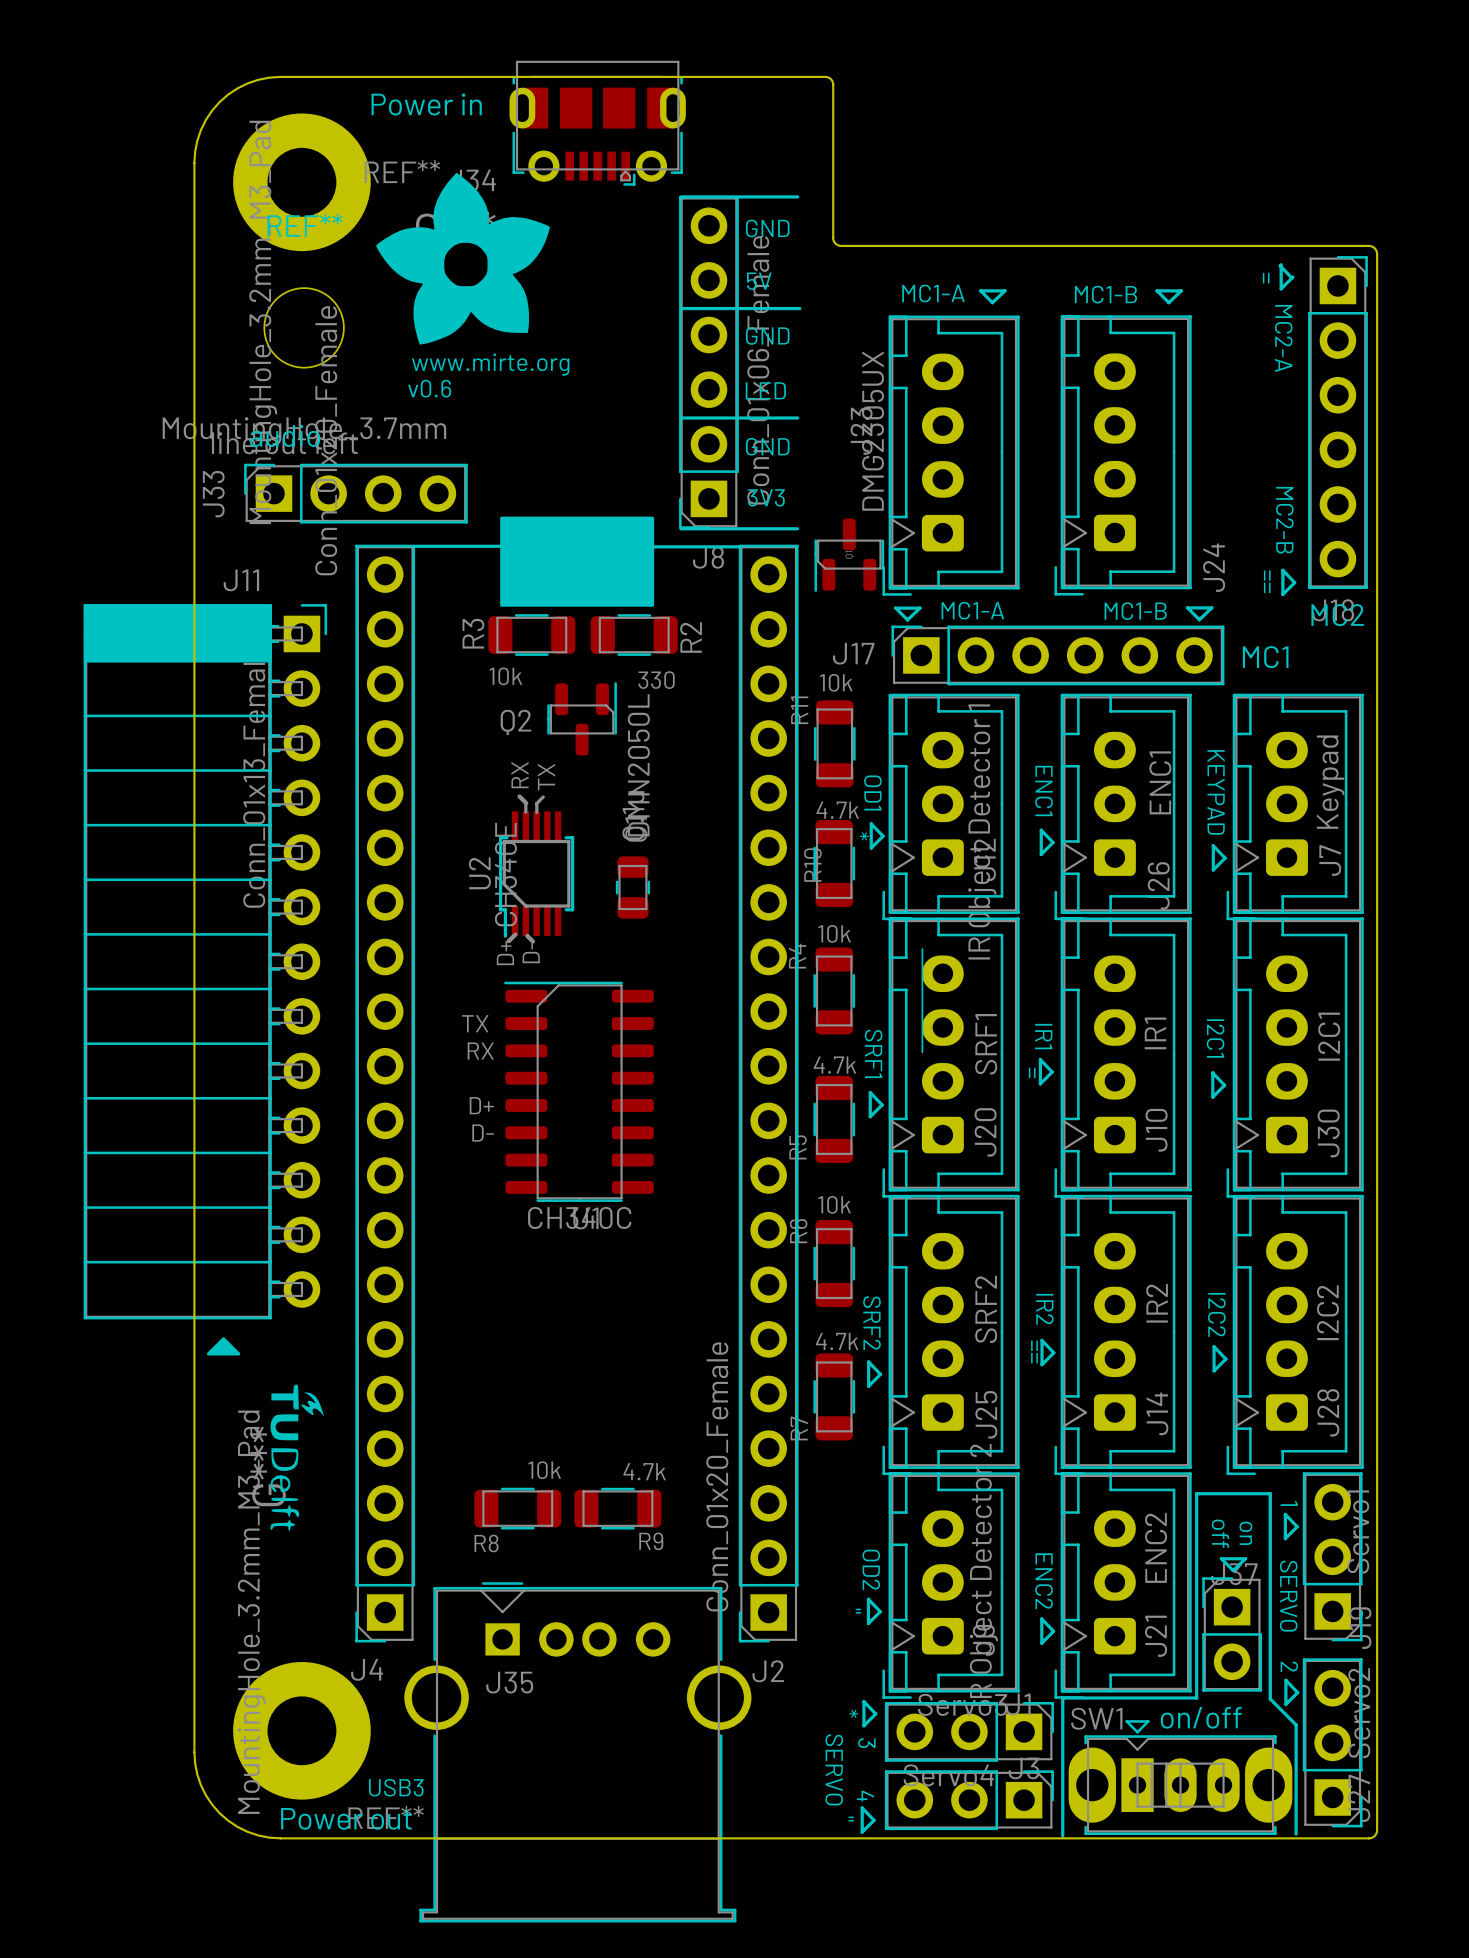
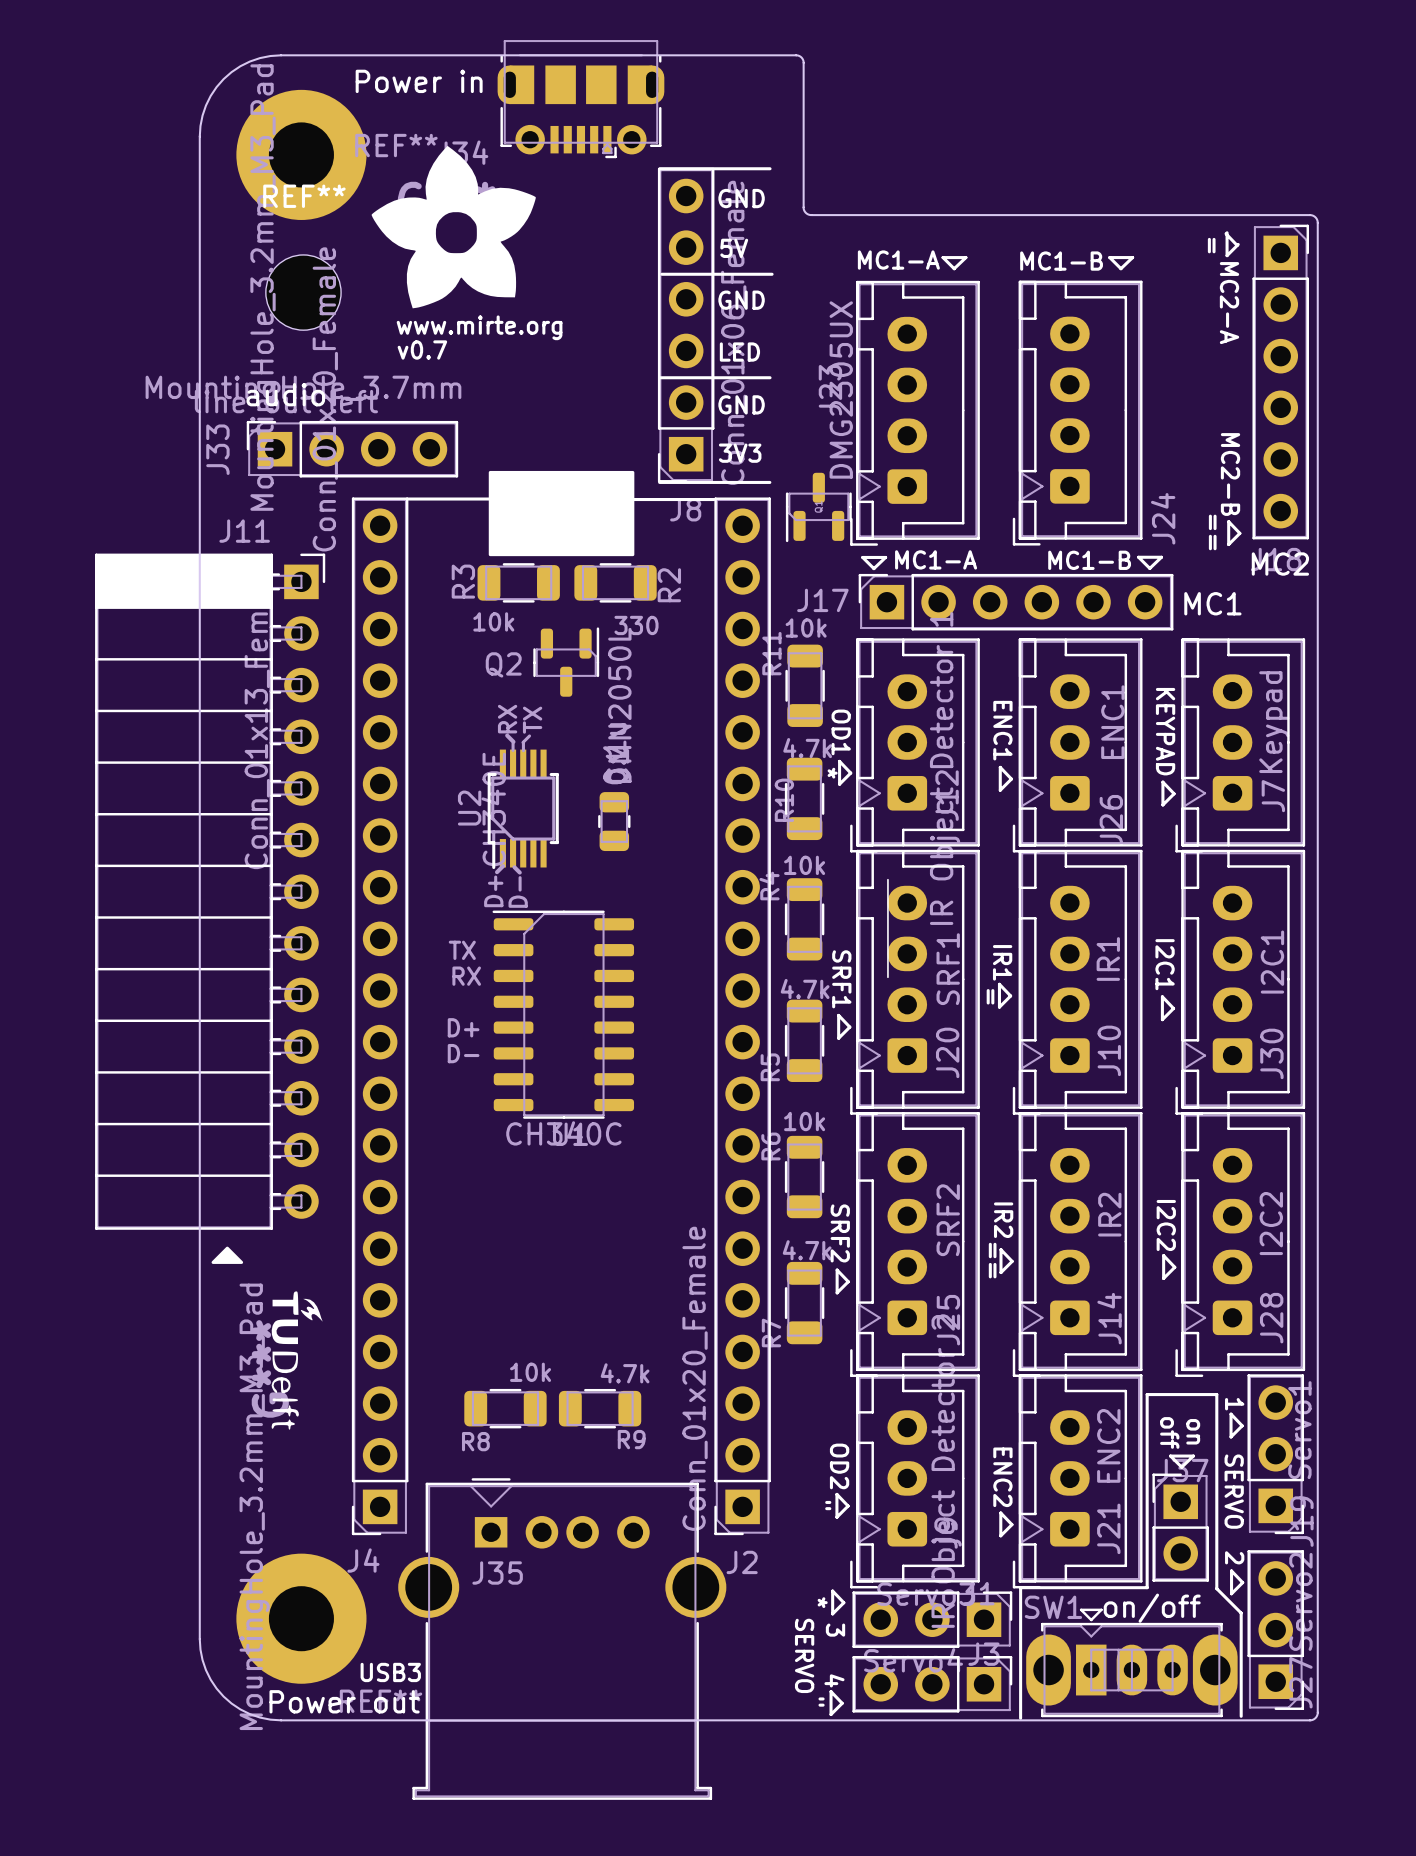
text: v0.6 (429, 388) -> v0.7 (422, 350)

